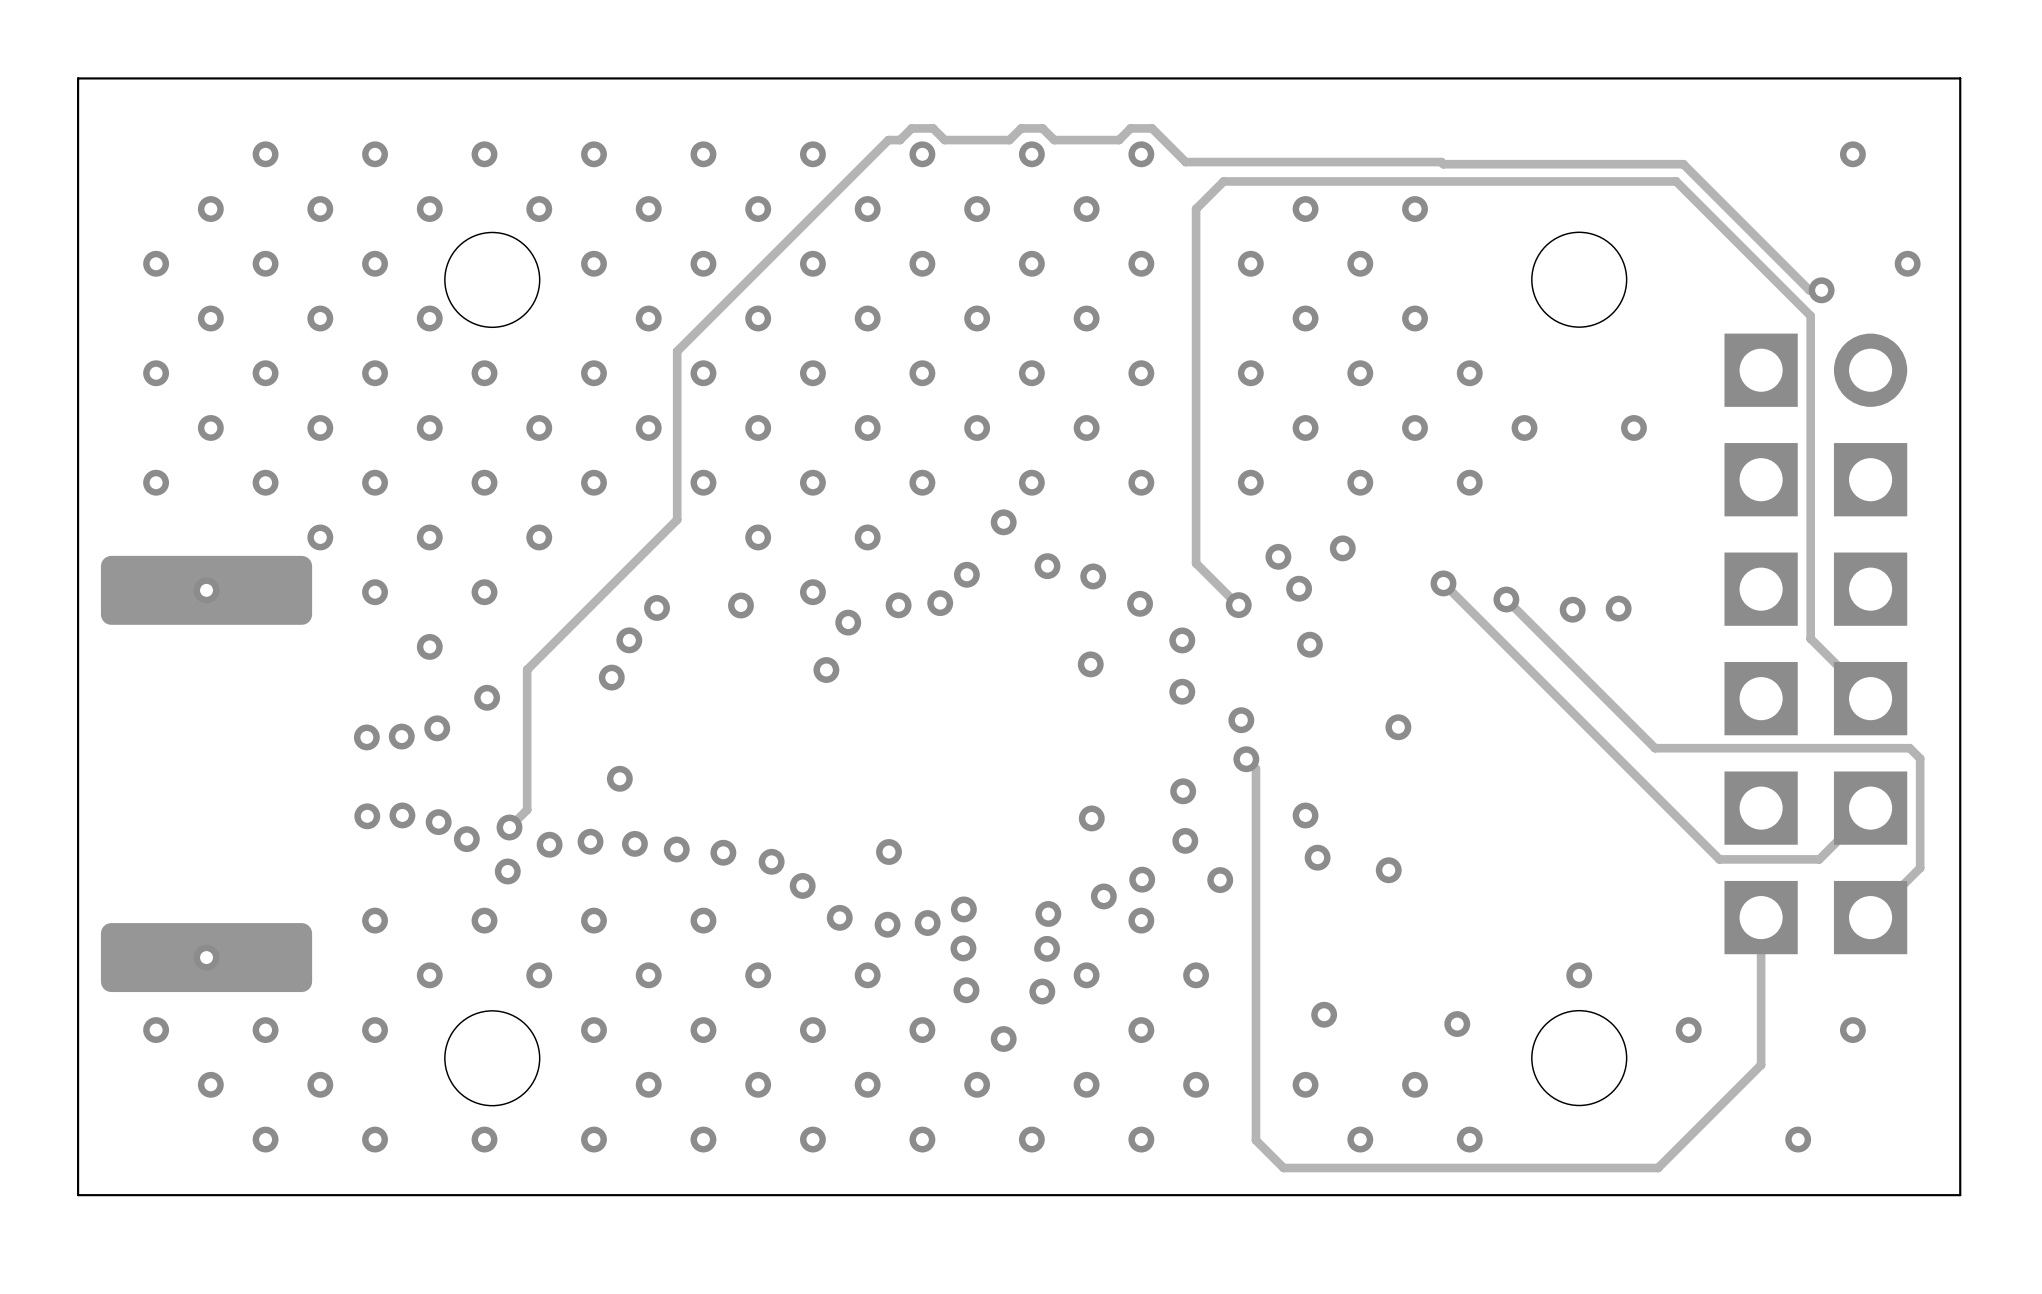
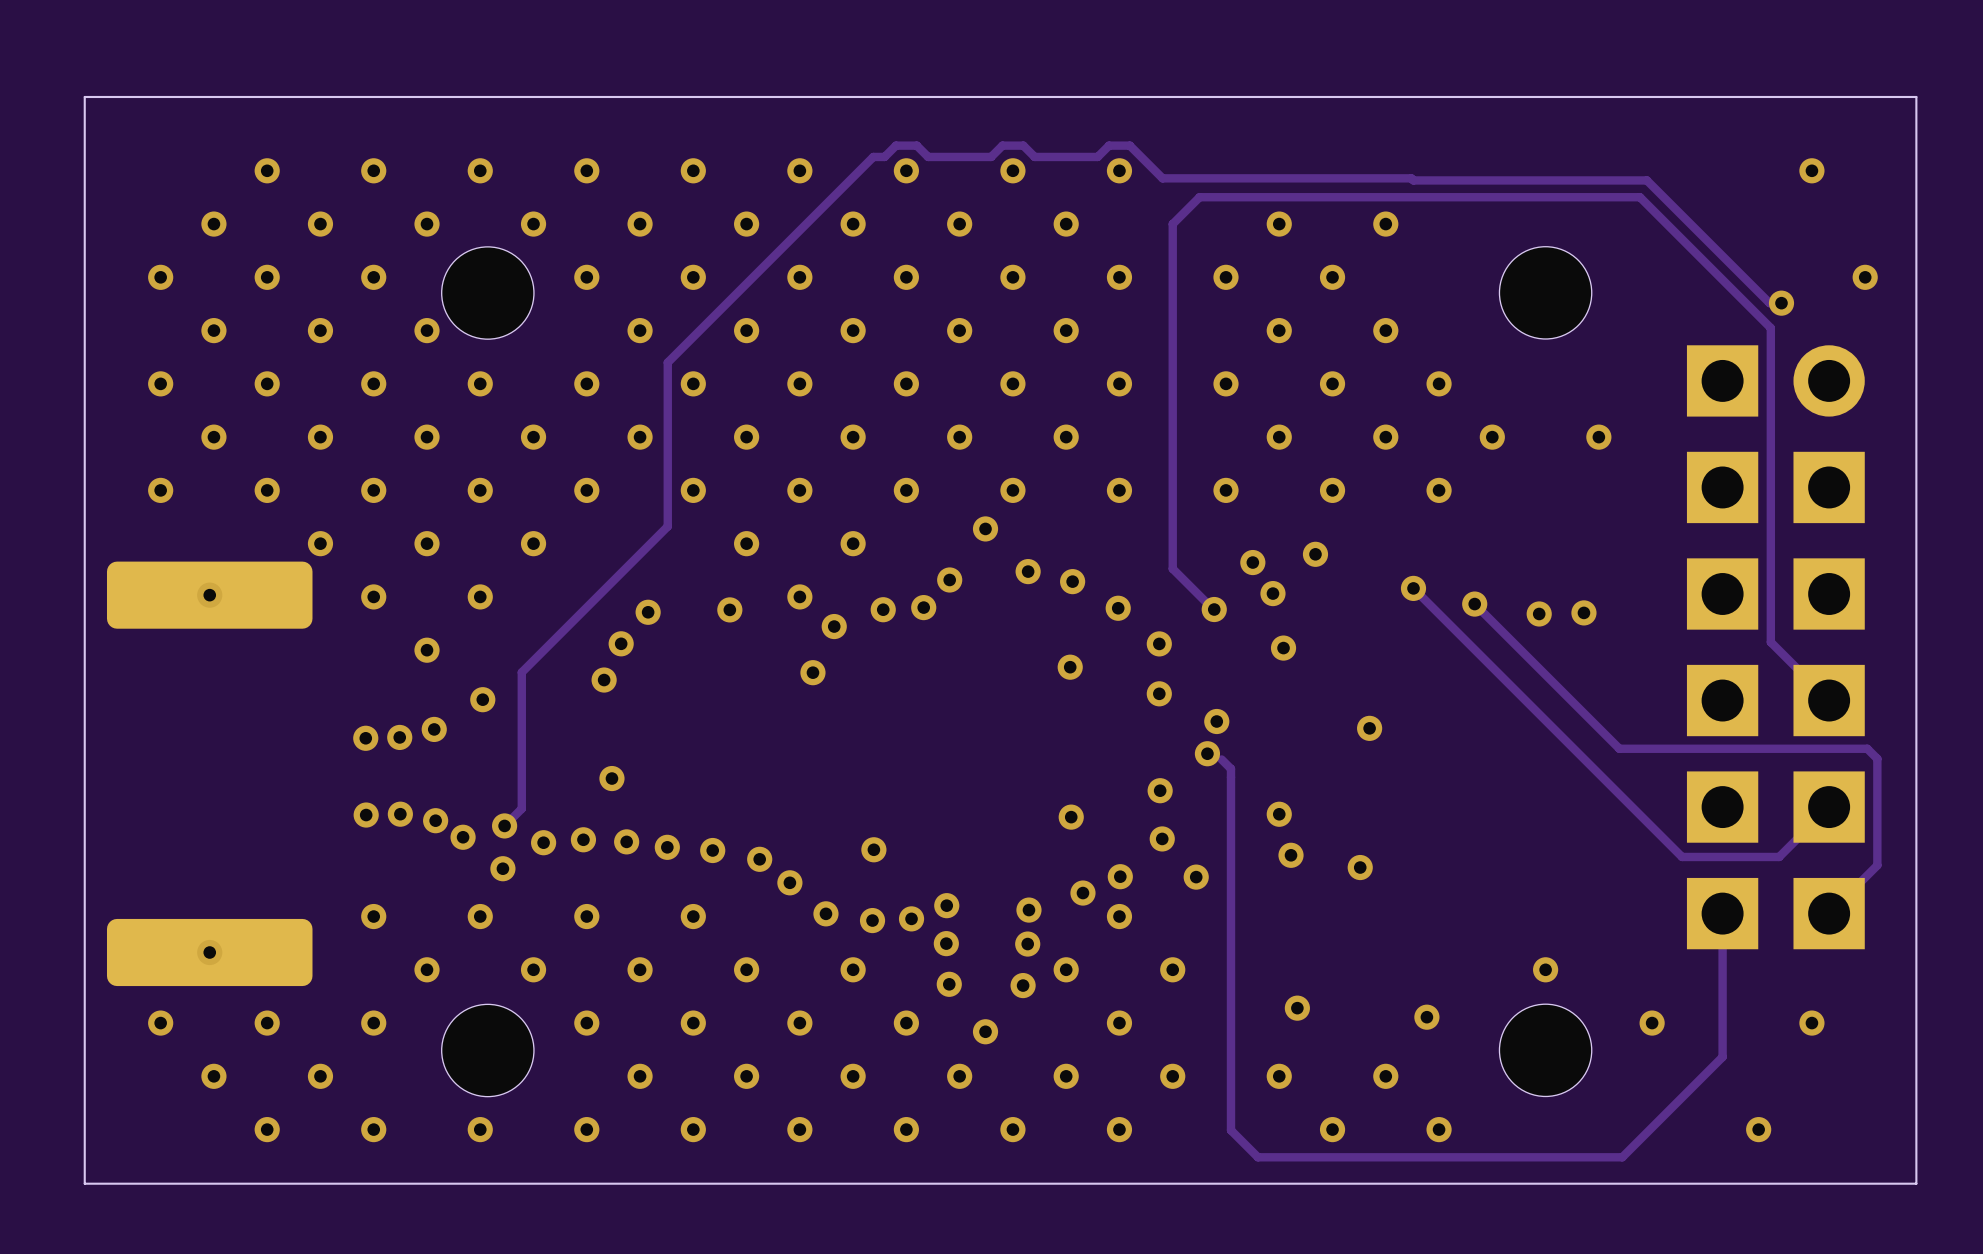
via position: (1246, 759) -> (1207, 753)

